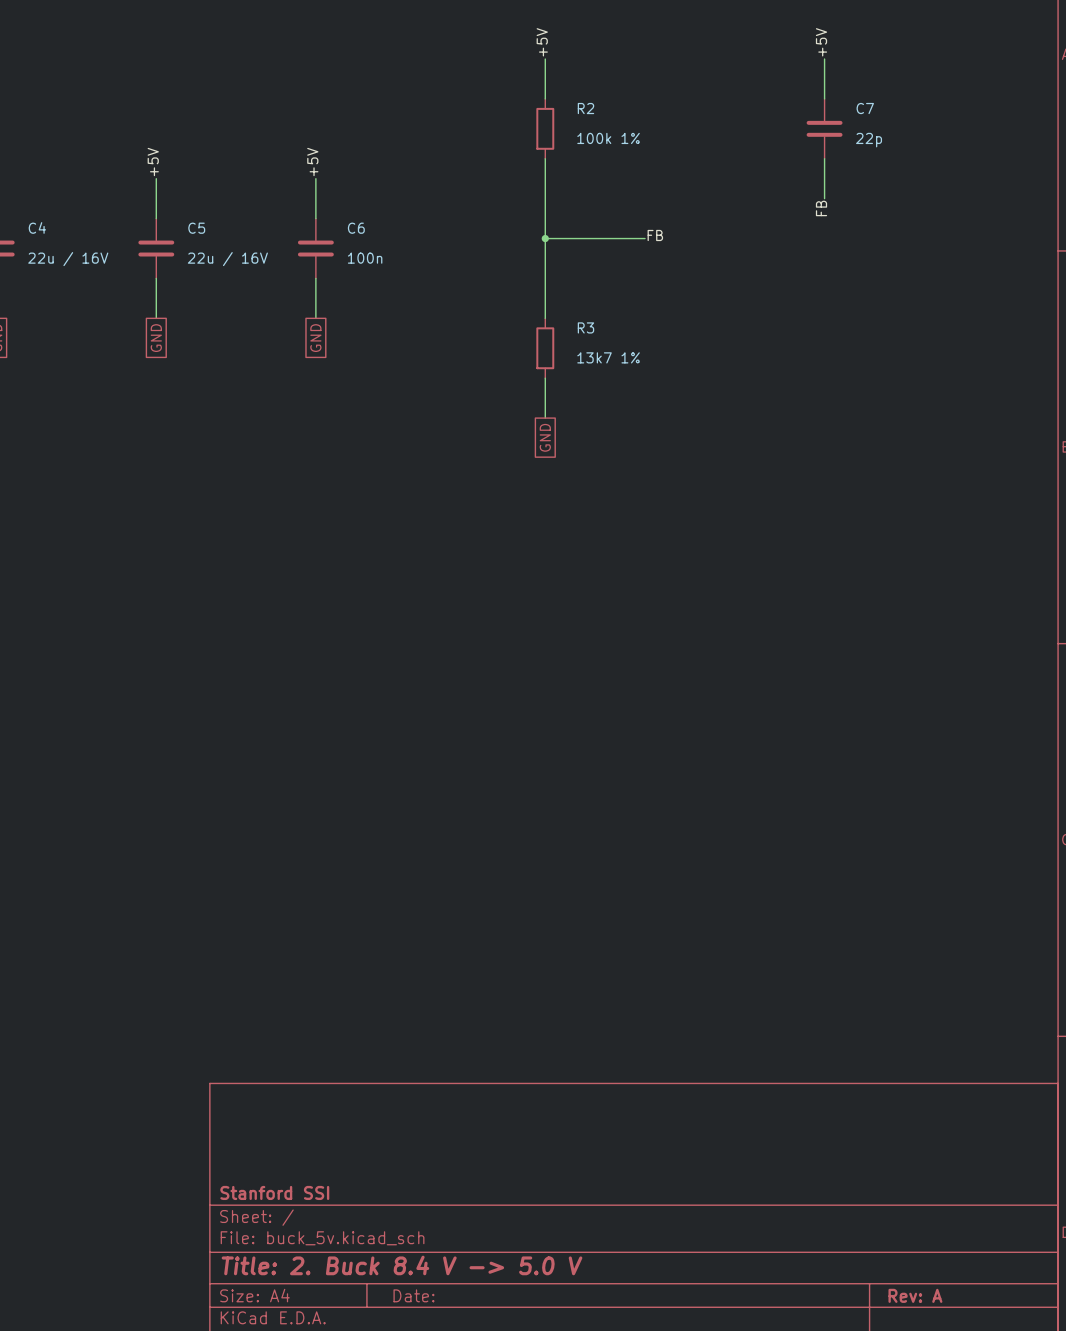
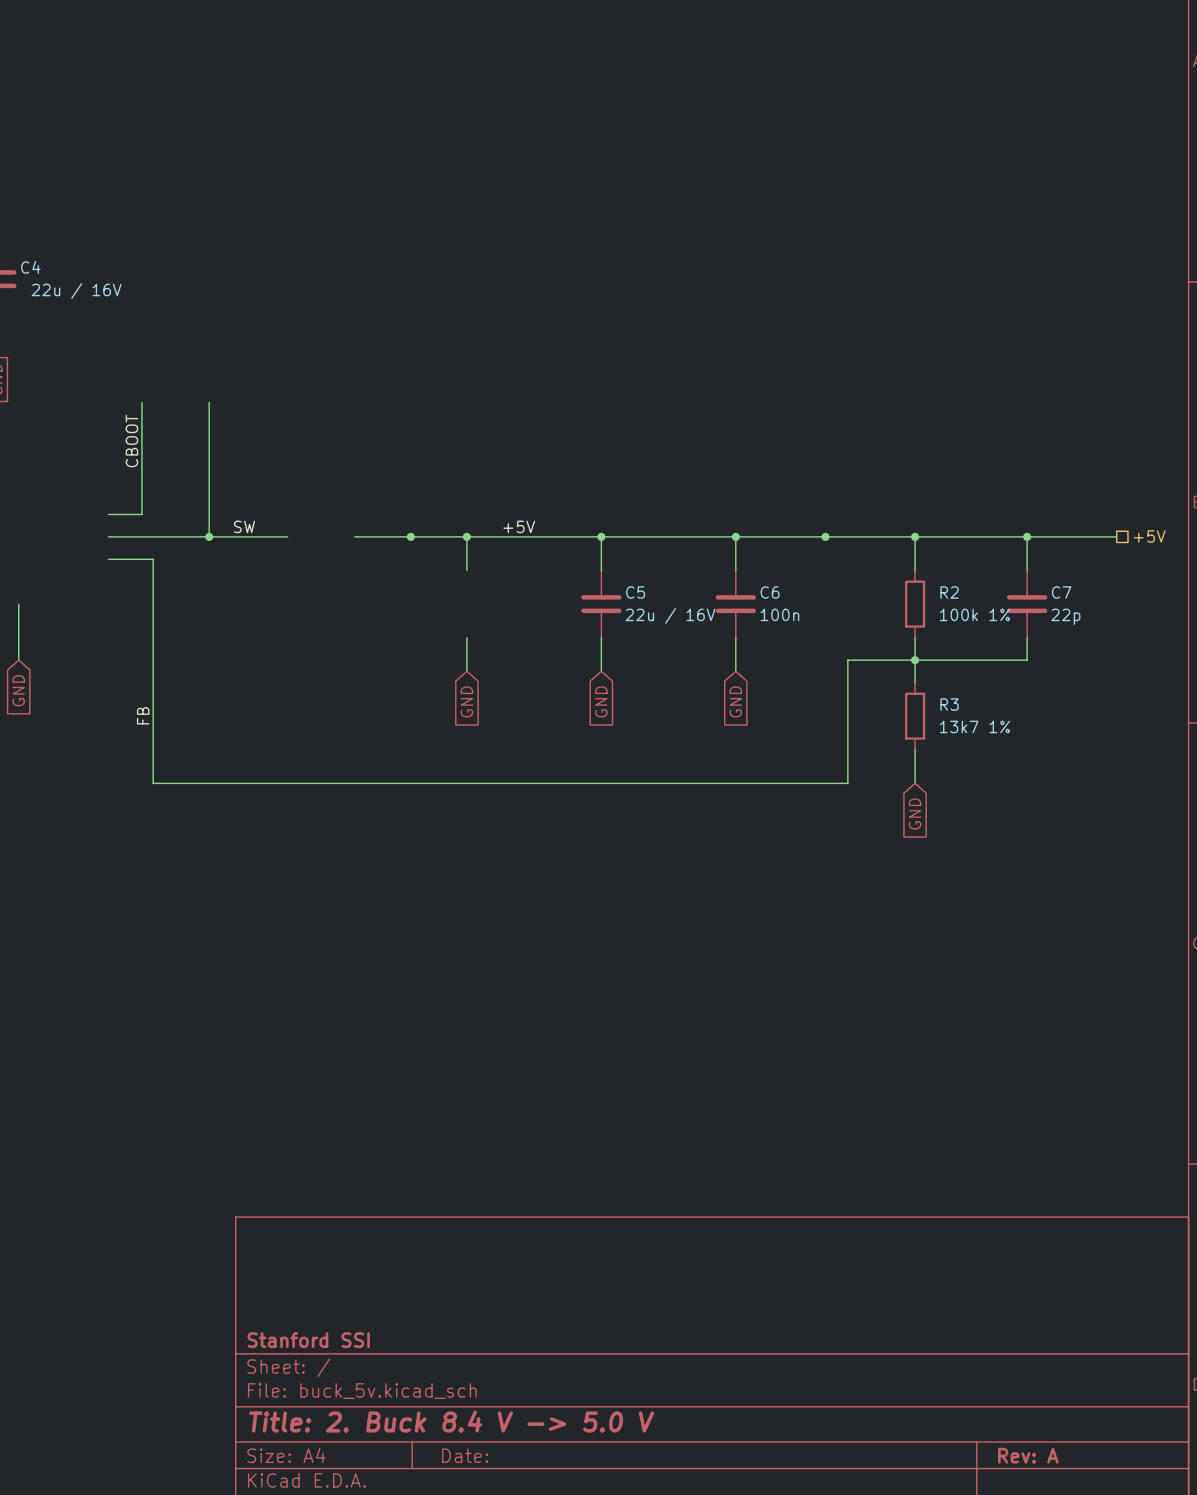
label: +5V (542, 42) -> none
label: +5V (821, 42) -> none
wire: (545, 59) (545, 98) -> none
wire: (824, 59) (824, 98) -> none
R2 name position: R2 (585, 108) -> R2 (949, 592)
C7 name position: C7 (865, 108) -> C7 (1061, 592)
R2 position: (545, 128) -> (915, 604)
C7 position: (824, 128) -> (1027, 604)
R2 value position: 100k 1% (608, 138) -> 100k 1% (974, 614)
C7 value position: 22p (869, 140) -> 22p (1065, 616)
wire: (545, 158) (545, 318) -> none
wire: (824, 158) (824, 198) -> none
label: +5V (153, 162) -> none
label: +5V (312, 162) -> none
wire: (156, 178) (156, 218) -> none
wire: (315, 178) (315, 218) -> none
label: FB (821, 208) -> none
C4 name position: C4 (37, 227) -> C4 (30, 267)
C5 name position: C5 (196, 228) -> C5 (635, 592)
C6 name position: C6 (356, 228) -> C6 (770, 592)
label: FB (655, 235) -> none
wire: (545, 238) (645, 238) -> none
junction: (545, 238) -> none
C5 position: (156, 248) -> (601, 604)
C6 position: (315, 248) -> (735, 604)
C6 value position: 100n (365, 258) -> 100n (779, 614)
C5 value position: 22u / 16V (227, 259) -> 22u / 16V (670, 615)
wire: (156, 278) (156, 318) -> none
wire: (315, 278) (315, 318) -> none
R3 name position: R3 (585, 327) -> R3 (949, 704)
global label: GND (156, 338) -> none
global label: GND (315, 338) -> none
R3 position: (545, 348) -> (915, 716)
R3 value position: 13k7 1% (608, 357) -> 13k7 1% (974, 726)
wire: none -> (141, 402) (141, 514) (108, 514)
wire: none -> (209, 402) (209, 536)
wire: (545, 378) (545, 418) -> none
label: none -> CBOOT (131, 441)
global label: GND (545, 437) -> none
label: none -> SW (244, 526)
label: none -> +5V (519, 526)
wire: none -> (108, 536) (287, 536)
junction: none -> (209, 536)
wire: none -> (354, 536) (1116, 536)
junction: none -> (410, 536)
wire: none -> (466, 536) (466, 570)
junction: none -> (466, 536)
wire: none -> (601, 536) (601, 570)
junction: none -> (601, 536)
wire: none -> (735, 536) (735, 570)
junction: none -> (735, 536)
junction: none -> (825, 536)
wire: none -> (915, 536) (915, 570)
junction: none -> (915, 536)
wire: none -> (1027, 536) (1027, 570)
junction: none -> (1027, 536)
hierarchical label: none -> +5V (1149, 536)
wire: none -> (108, 559) (153, 559) (153, 783) (847, 783) (847, 660) (1027, 660) (1027, 637)
wire: none -> (18, 604) (18, 660)
wire: none -> (466, 637) (466, 671)
wire: none -> (601, 637) (601, 671)
wire: none -> (735, 637) (735, 671)
wire: none -> (915, 637) (915, 682)
junction: none -> (915, 660)
global label: none -> GND (18, 690)
global label: none -> GND (466, 701)
global label: none -> GND (601, 701)
global label: none -> GND (735, 701)
label: none -> FB (143, 715)
wire: none -> (915, 749) (915, 783)
global label: none -> GND (915, 813)

